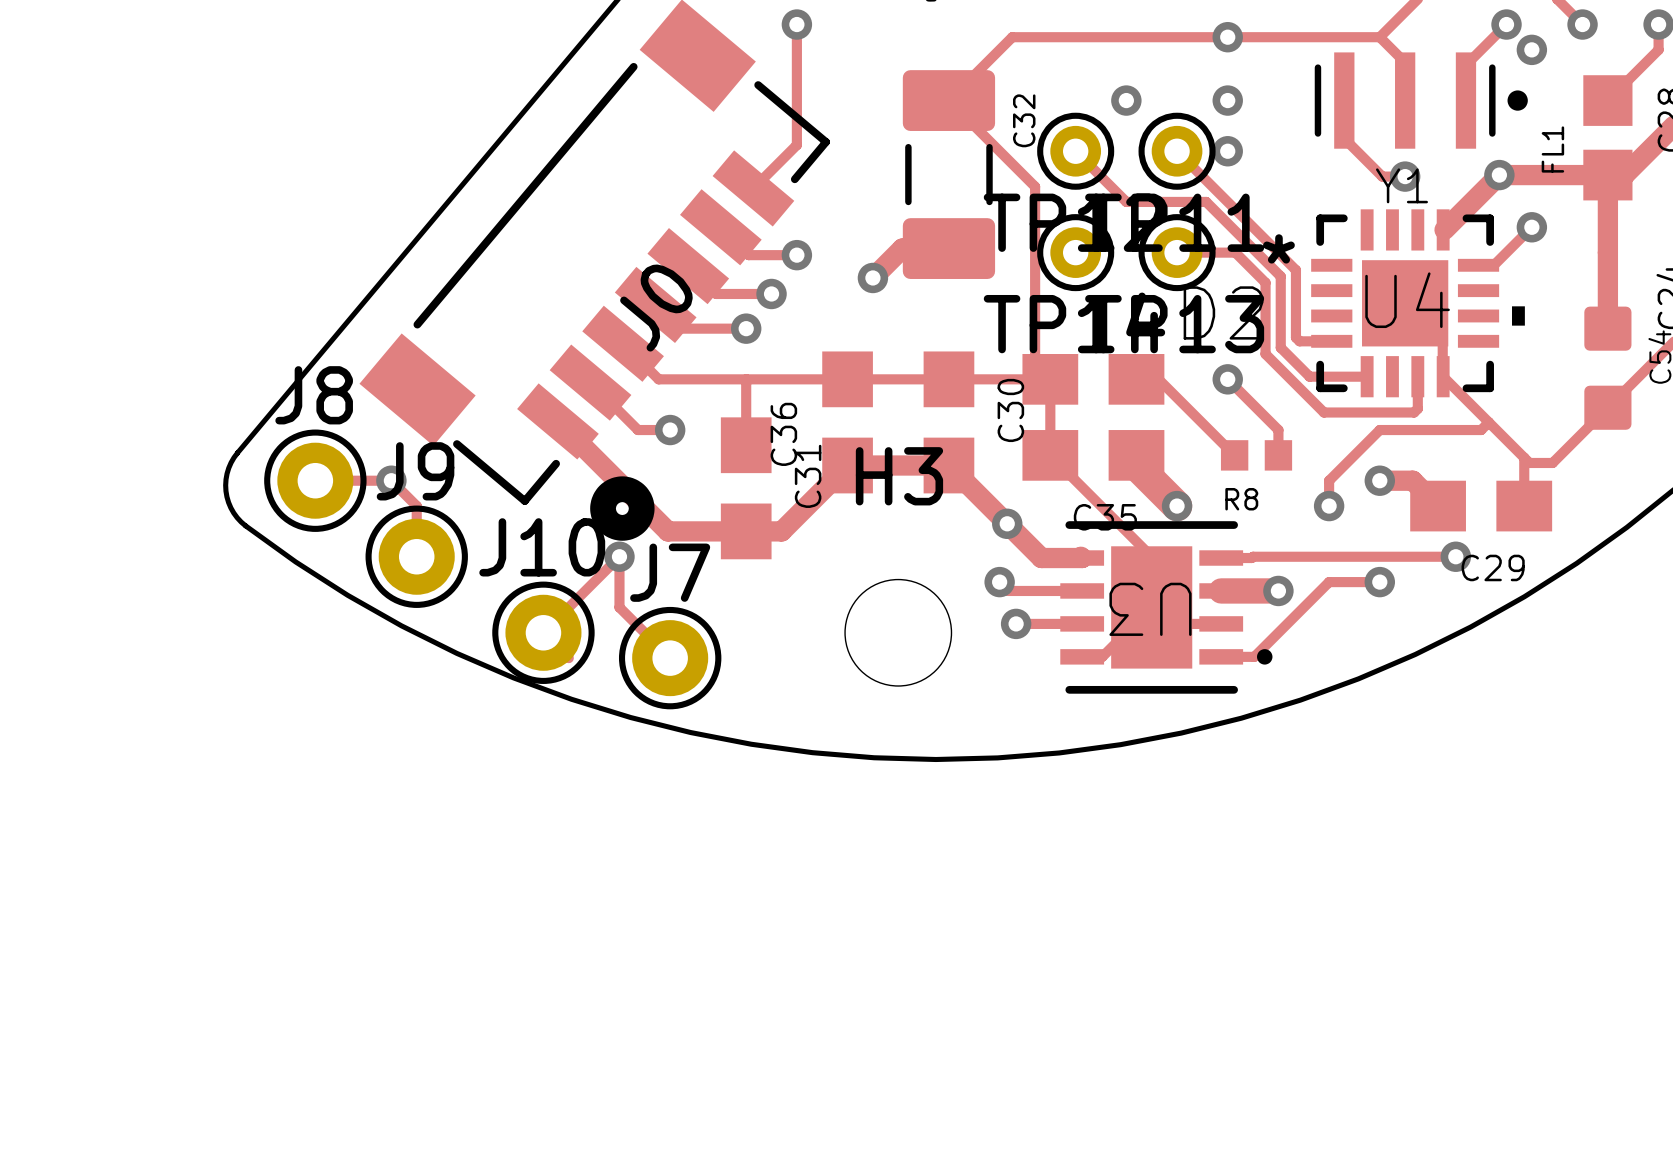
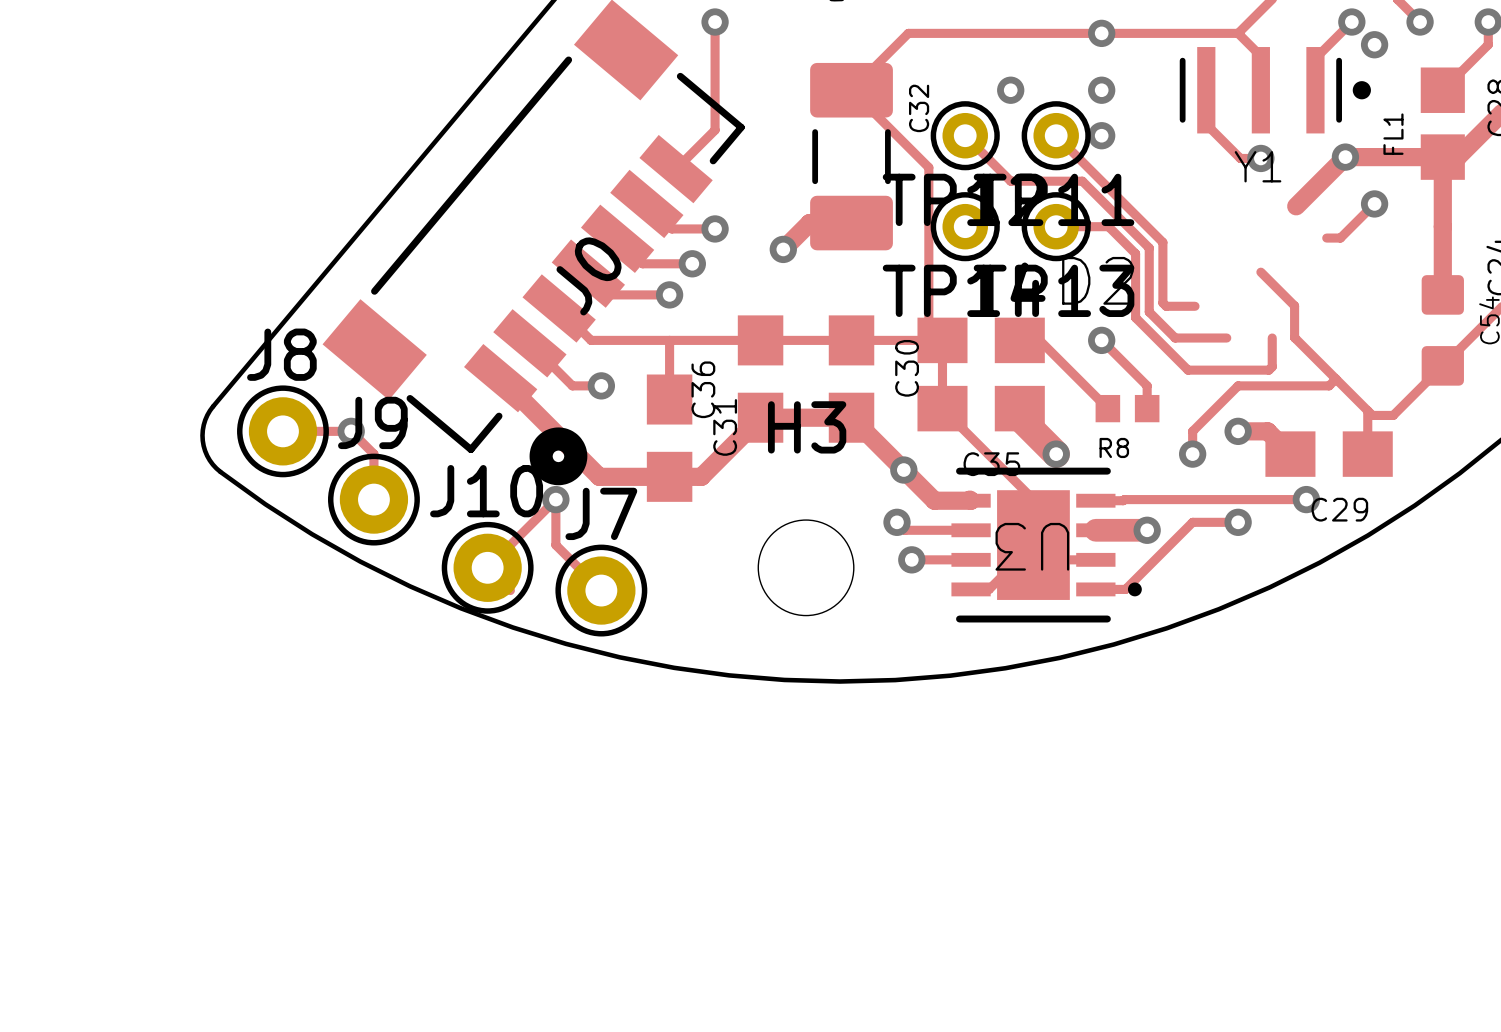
U4: (1418, 303) -> none

